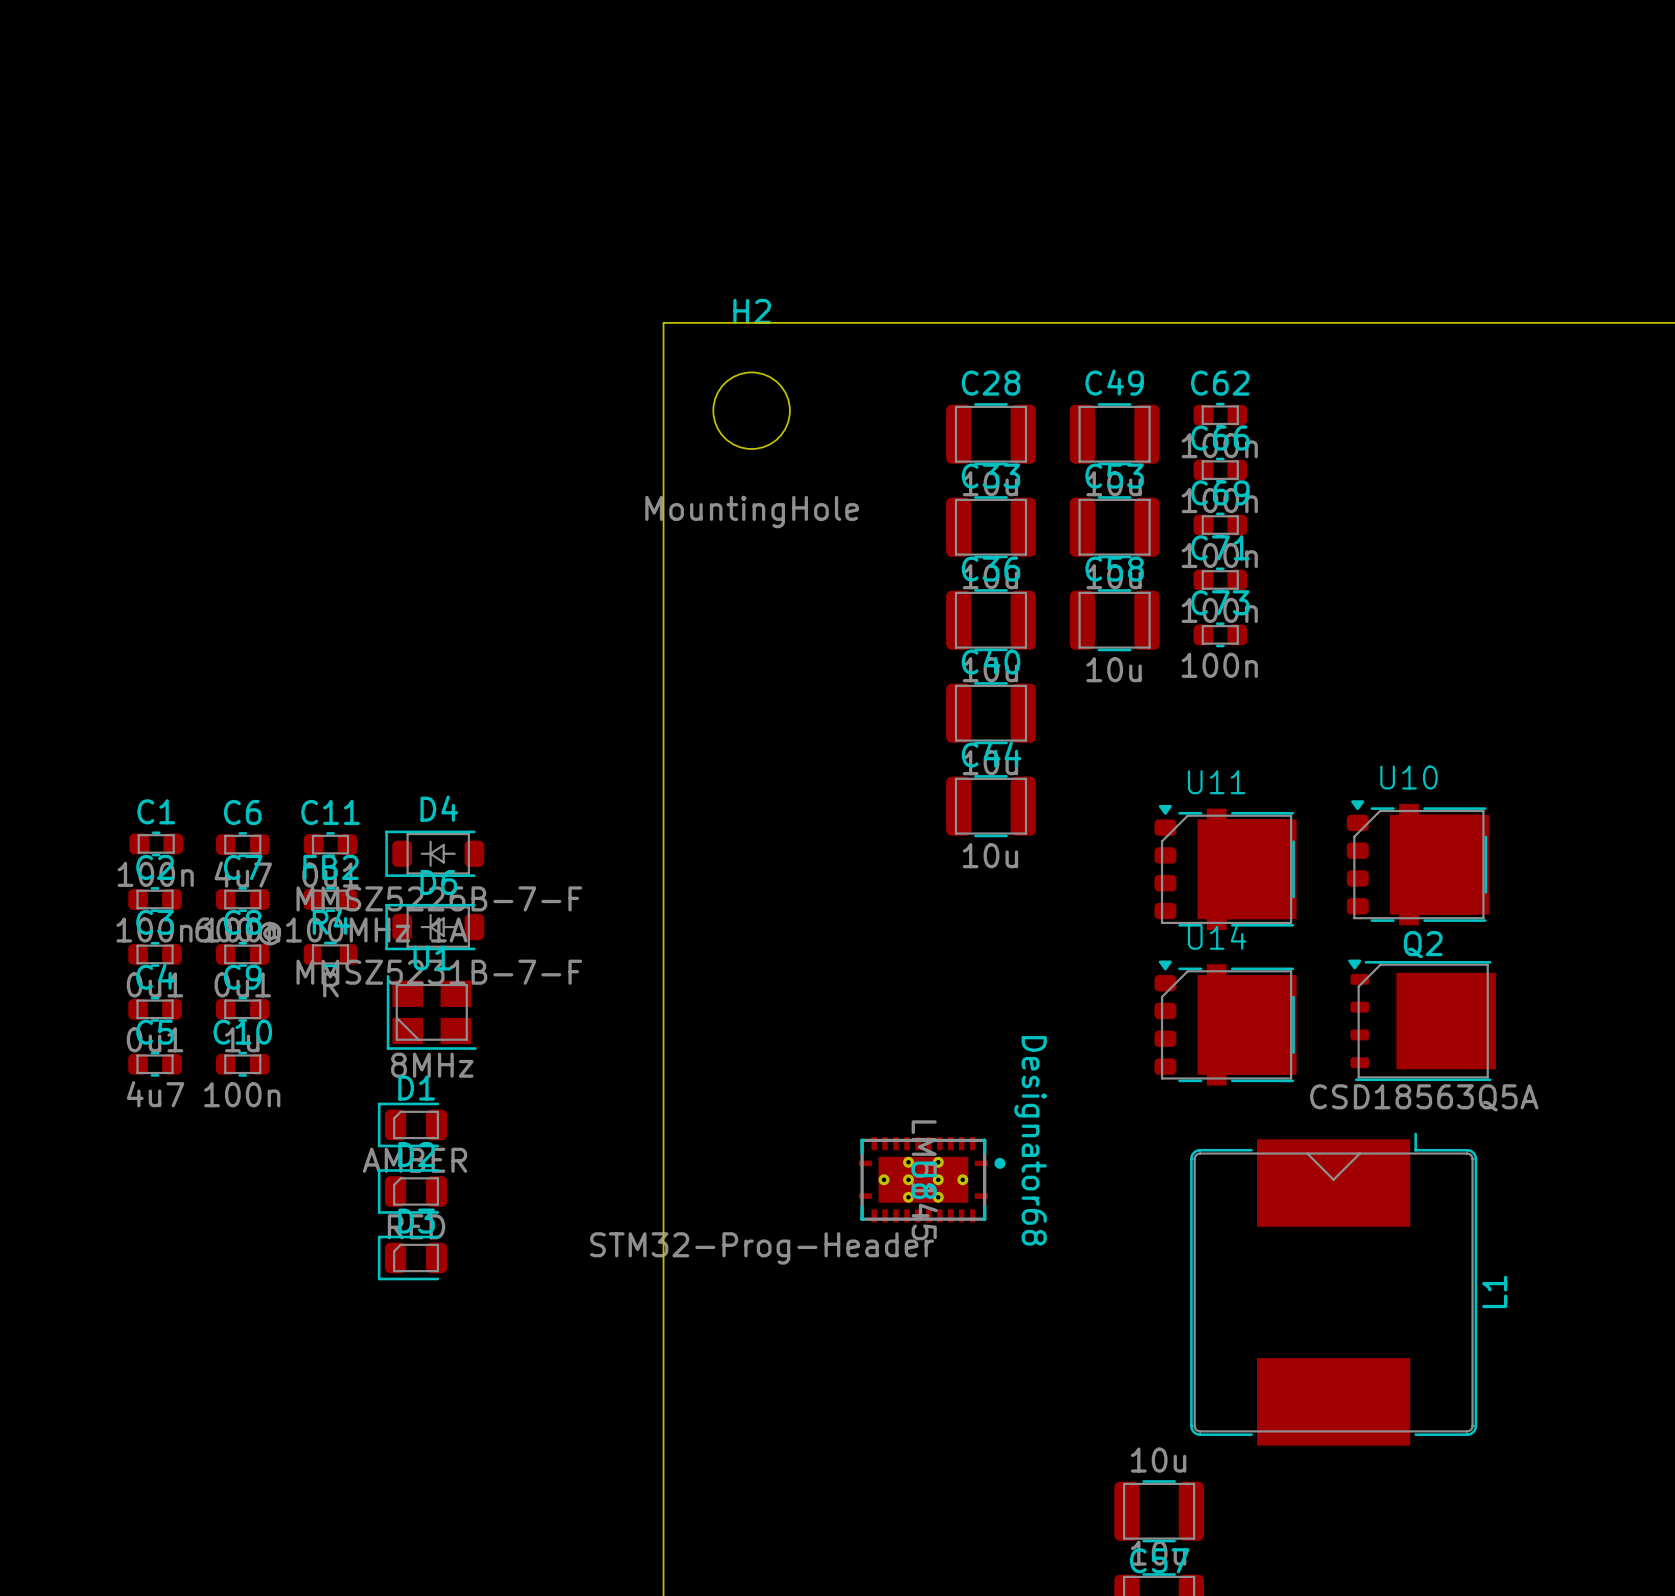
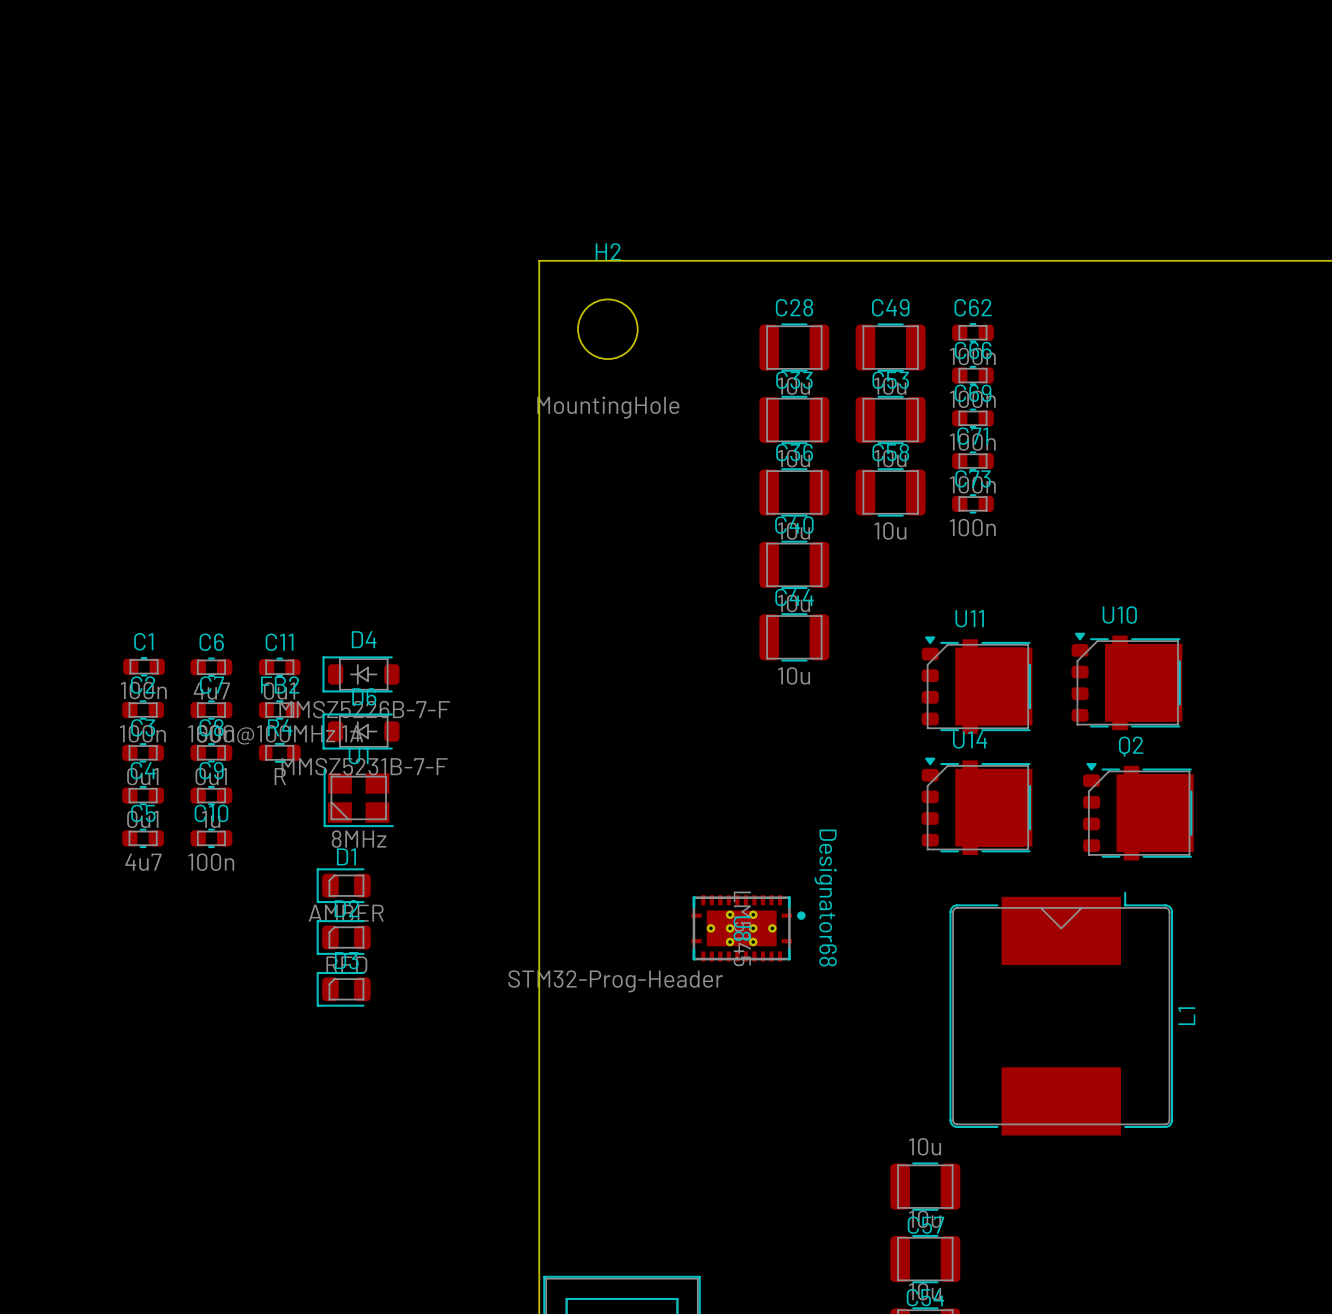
Q2 footprint: [1348, 959, 1496, 1082] -> [1083, 763, 1194, 861]
Q2 value: CSD18563Q5A (1424, 1097) -> none

